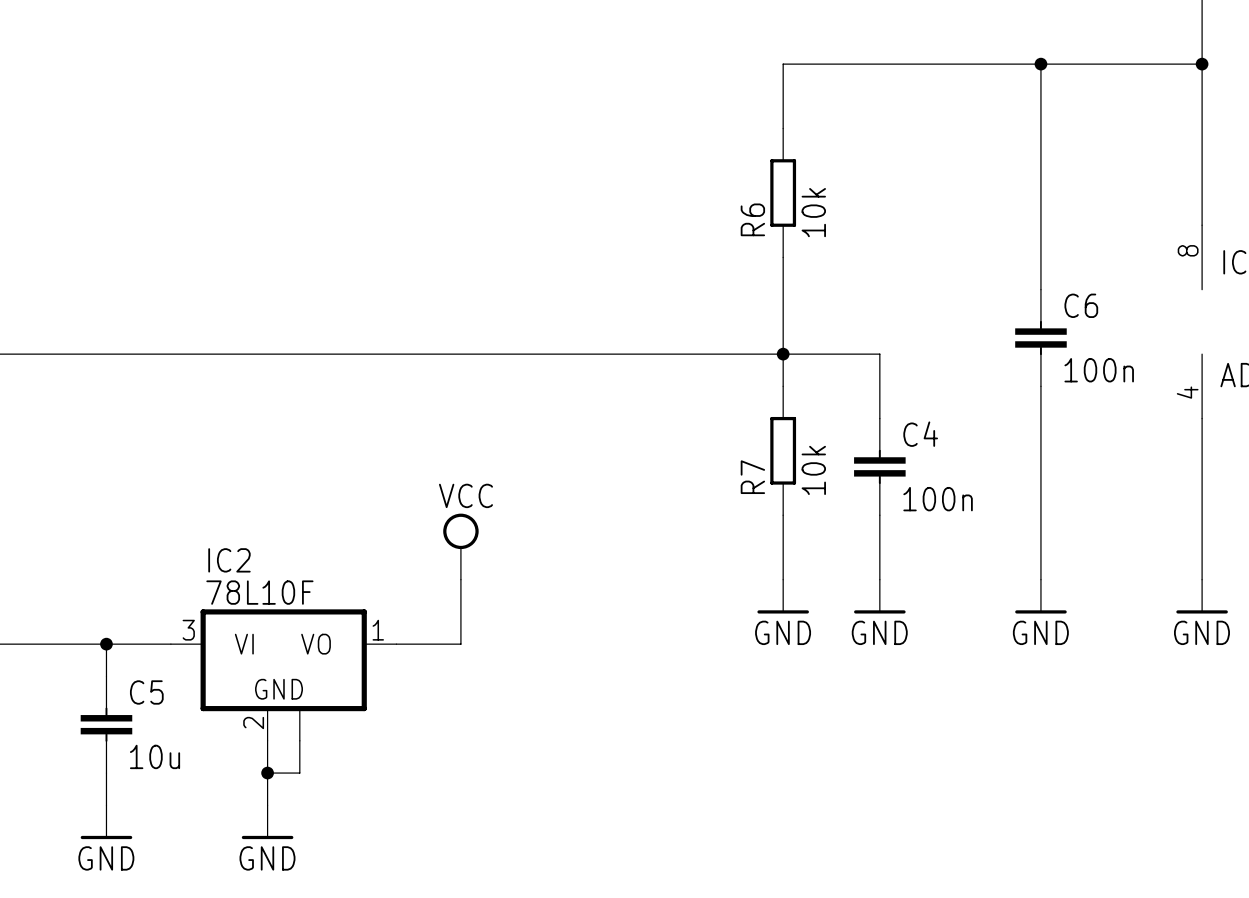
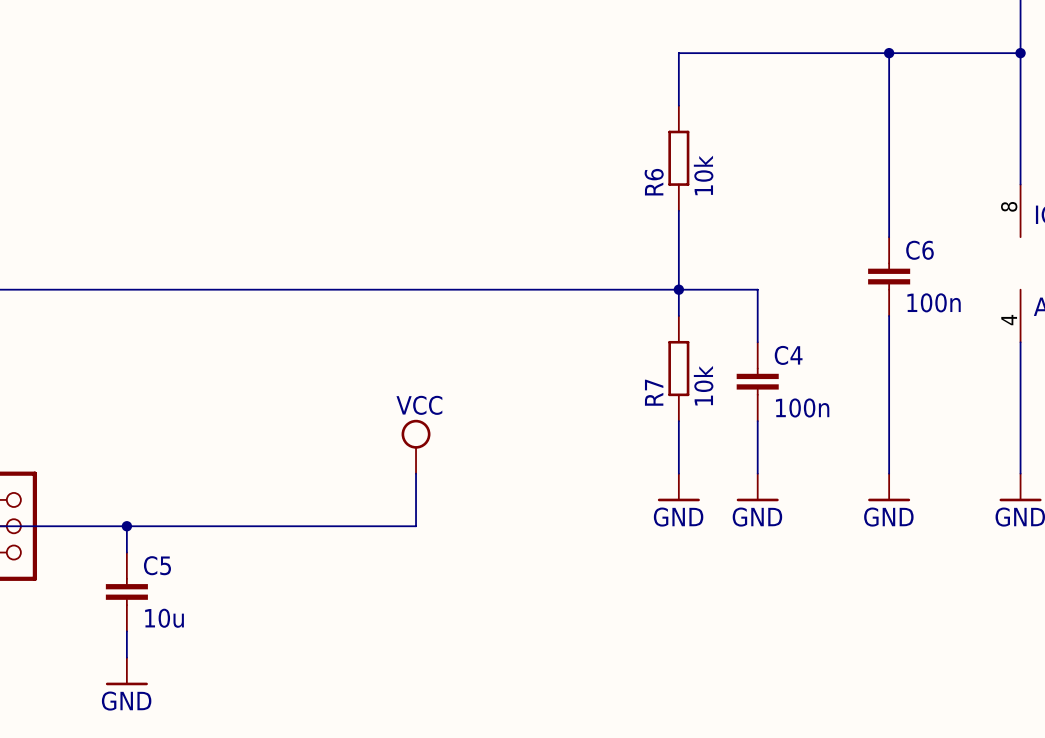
wire: none -> (179, 526) (363, 526)
IC2: 78L10F (283, 675) -> none
wire: (267, 740) (267, 805) -> none
wire: (299, 740) (299, 773) (267, 773) -> none
junction: (267, 773) -> none
power symbol: GND (267, 822) -> none

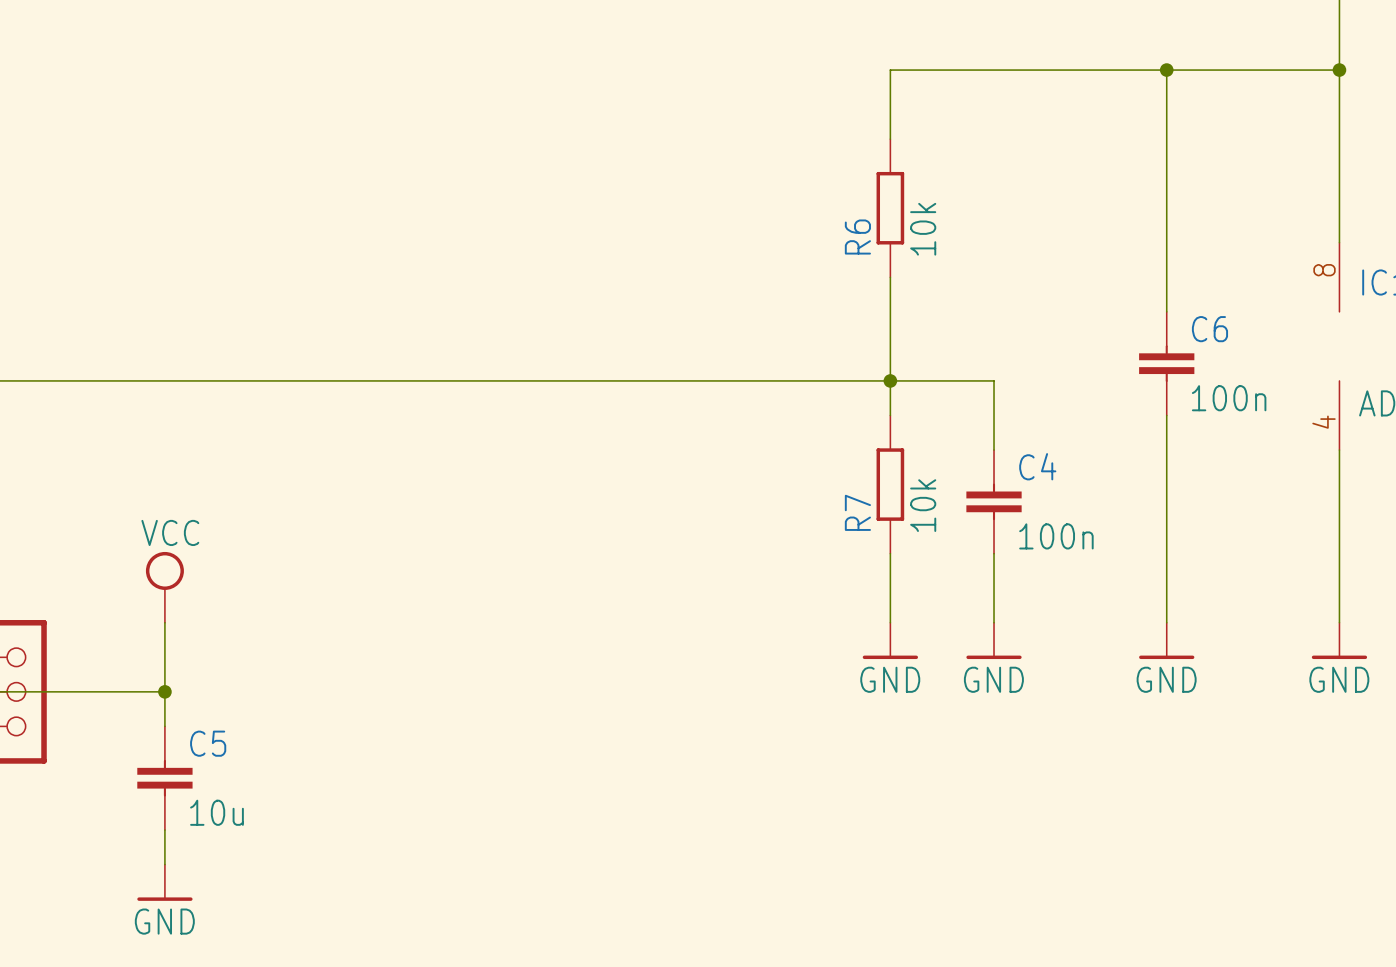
power symbol: none -> VCC (164, 587)
power symbol: VCC (416, 446) -> none
wire: (416, 473) (416, 526) (126, 526) -> (164, 622) (164, 691)

